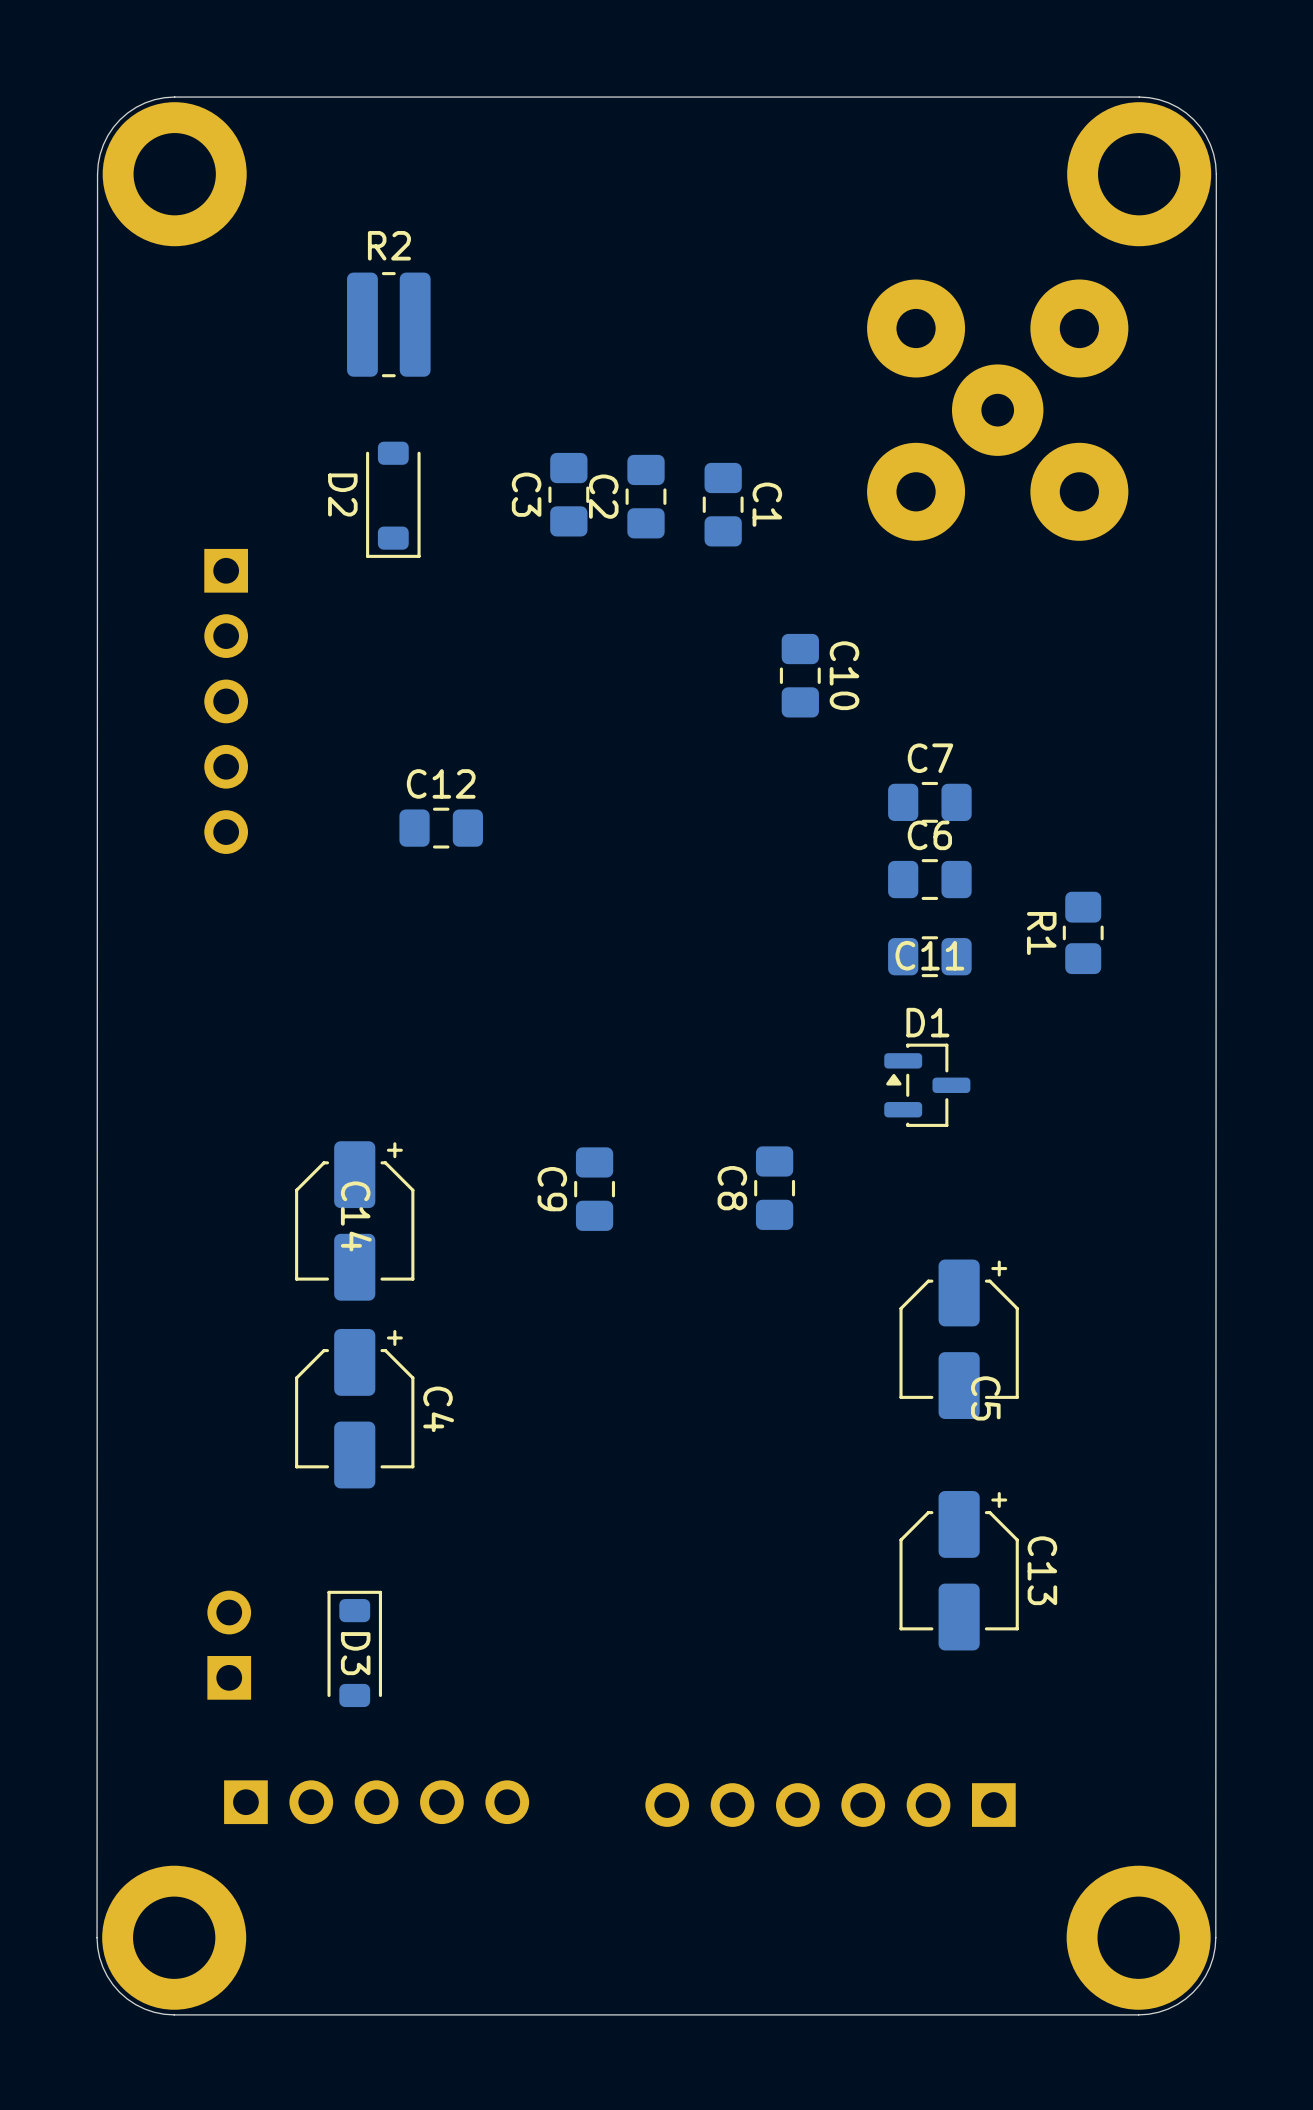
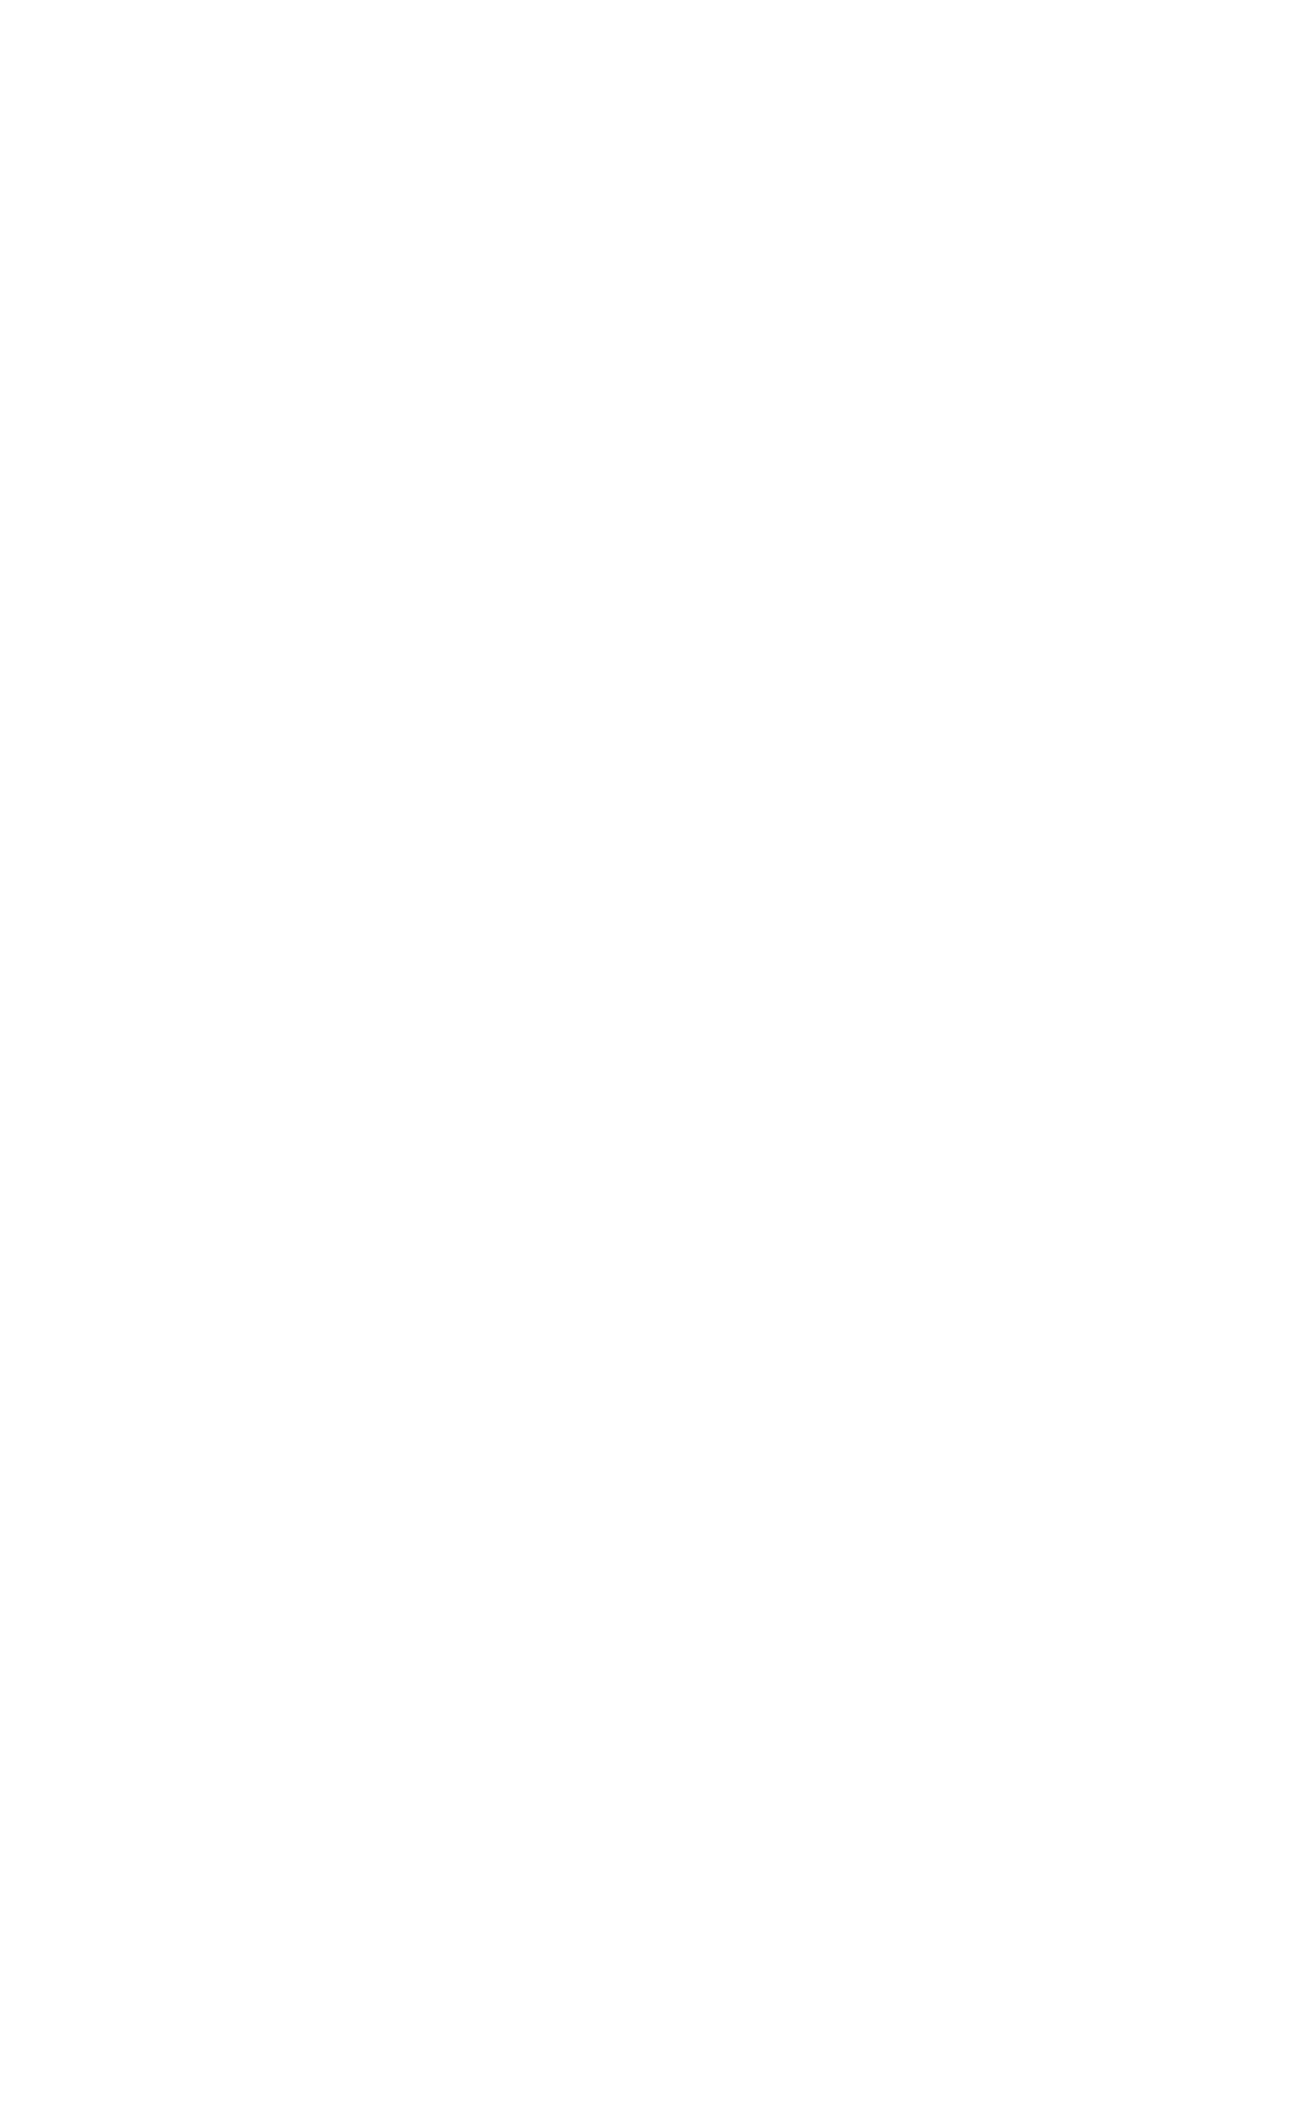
board edge: (1139, 97) (174, 97) (154, 99) (136, 107) (120, 119) (107, 135) (100, 154) (97, 174) (97, 1937) (99, 1957) (107, 1976) (119, 1992) (135, 2004) (154, 2012) (174, 2014) (1138, 2014) (1158, 2012) (1177, 2004) (1193, 1992) (1205, 1976) (1213, 1957) (1215, 1937) (1216, 174) (1210, 144) (1193, 119) (1168, 102) (1139, 97) -> none
part: (174, 174) -> none
part: (1139, 174) -> none
R2: (388, 324) -> none
part: (997, 410) -> none
C3: (568, 494) -> none
C2: (646, 496) -> none
D2: (393, 499) -> none
C1: (723, 504) -> none
C10: (800, 675) -> none
part: (226, 701) -> none
C7: (929, 802) -> none
C12: (441, 828) -> none
C6: (929, 879) -> none
R1: (1083, 932) -> none
C11: (929, 956) -> none
D1: (927, 1085) -> none
C8: (774, 1188) -> none
C9: (594, 1189) -> none
C14: (354, 1220) -> none
C5: (959, 1339) -> none
C4: (354, 1408) -> none
C13: (959, 1570) -> none
part: (229, 1645) -> none
D3: (354, 1648) -> none
part: (376, 1802) -> none
part: (830, 1805) -> none
part: (174, 1937) -> none
part: (1138, 1937) -> none

